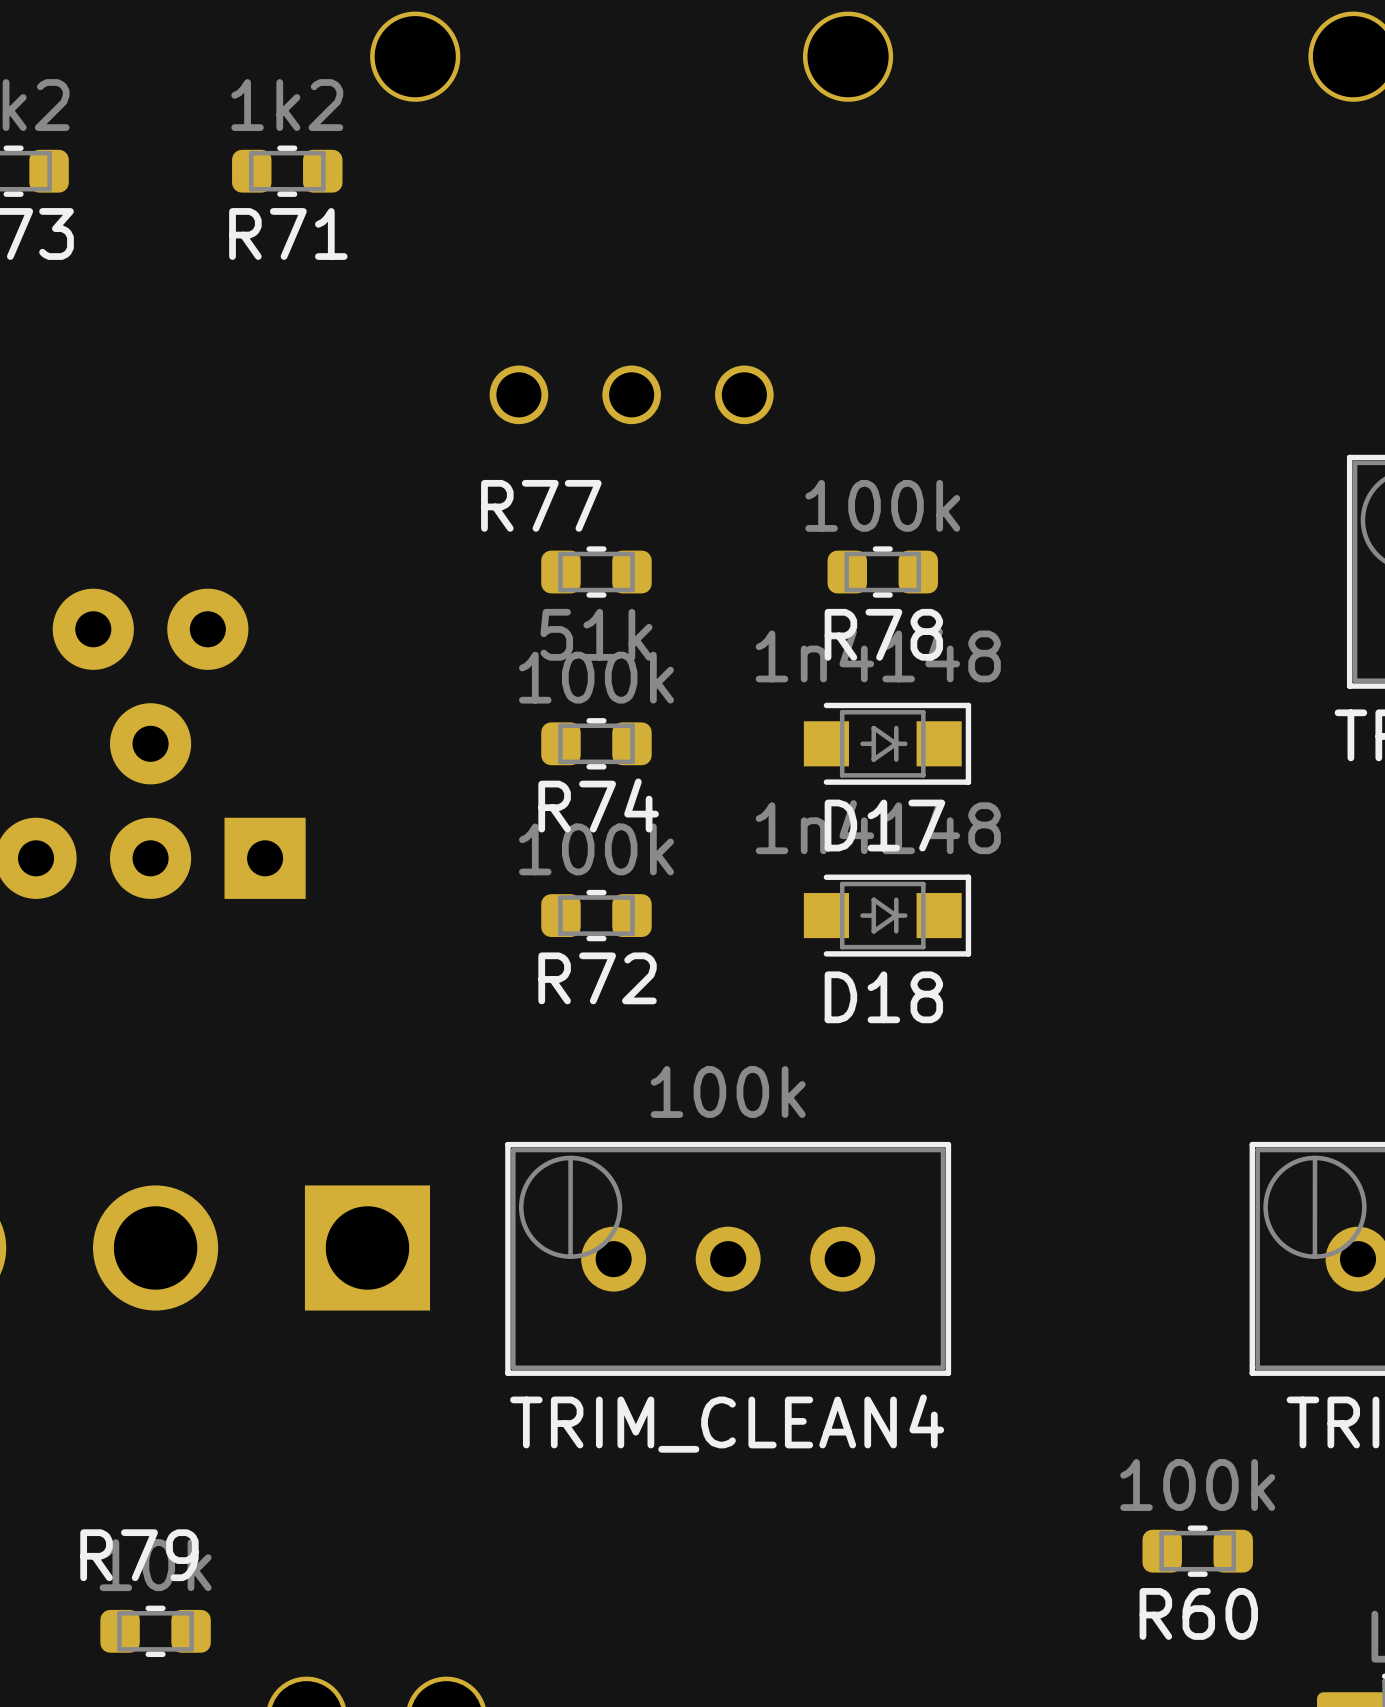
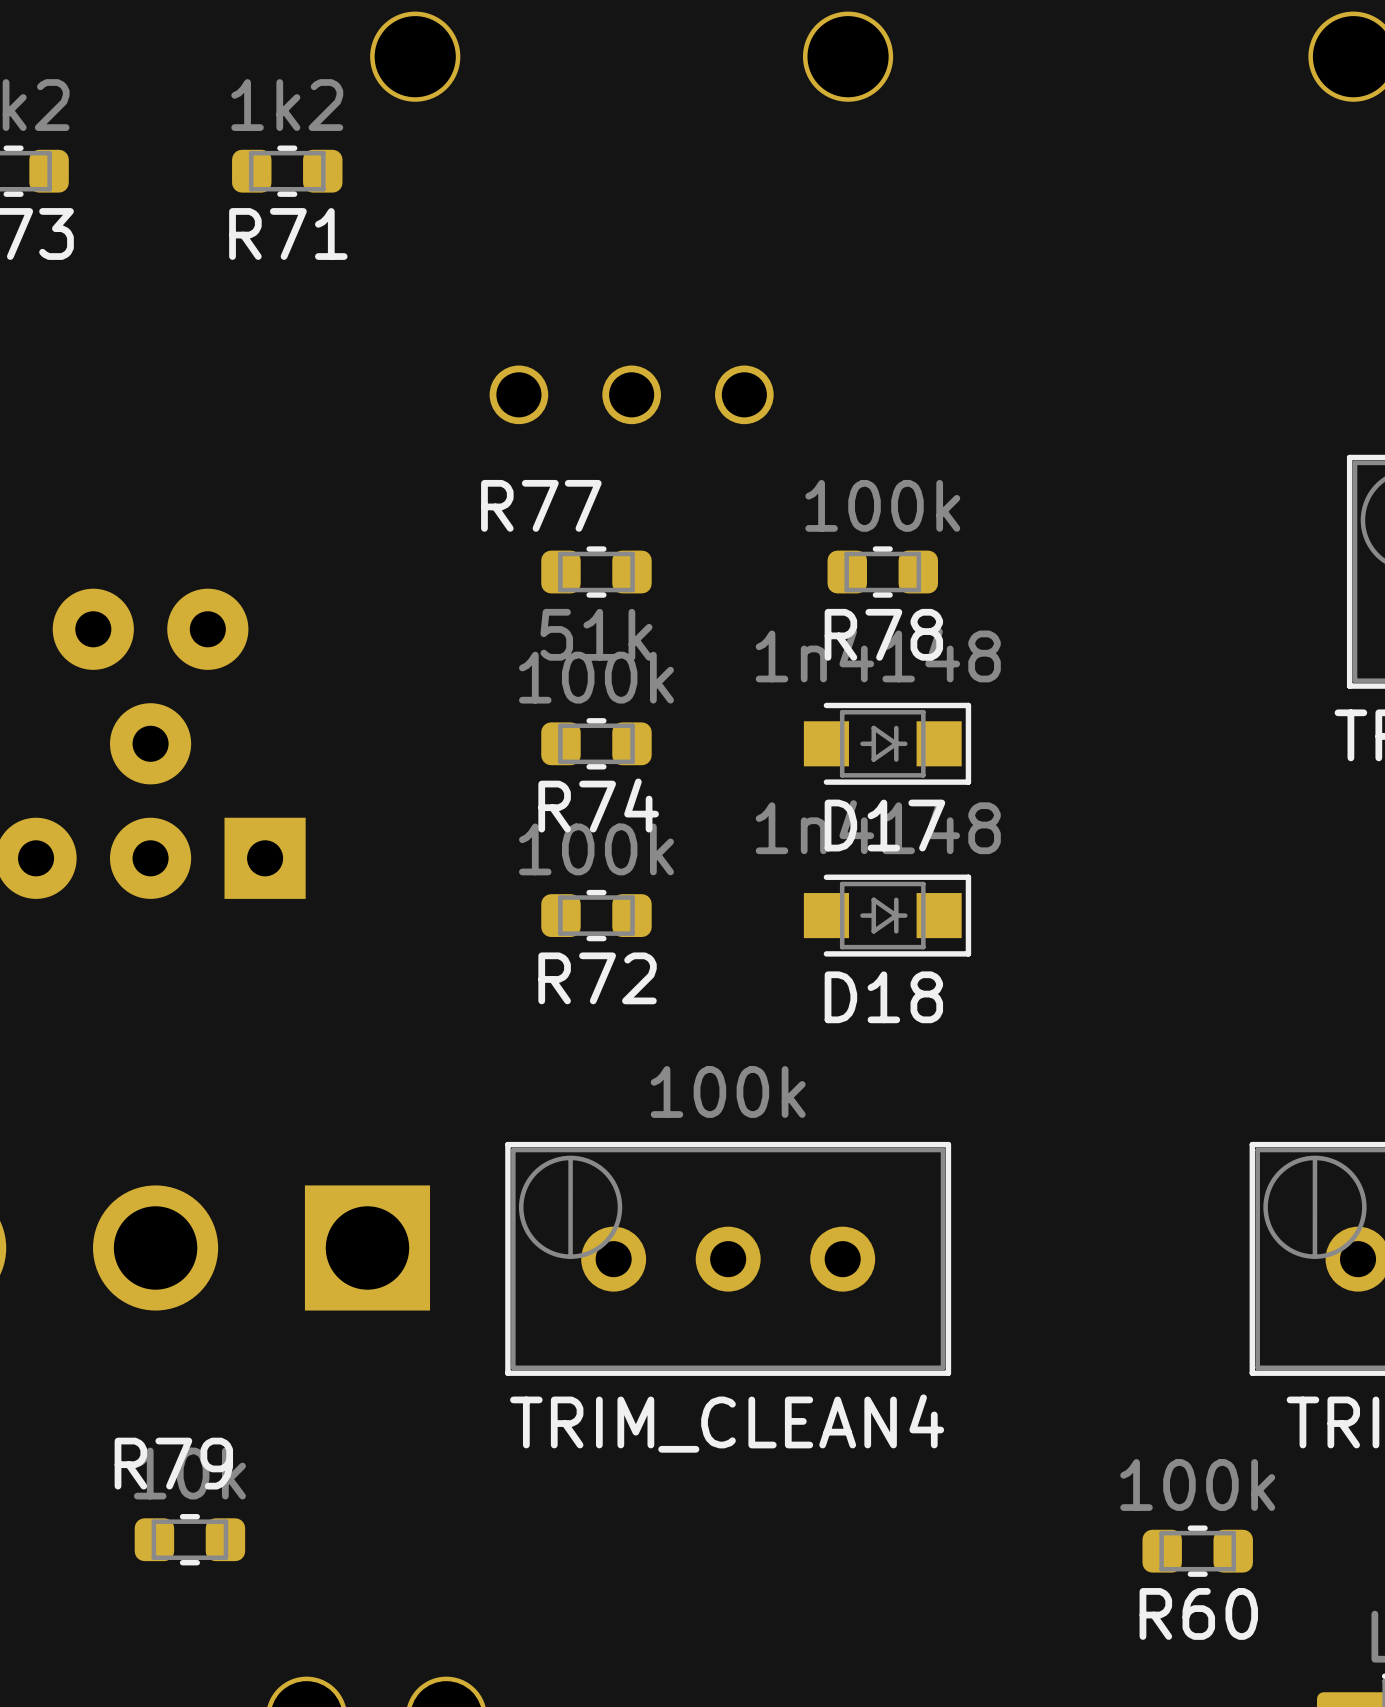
R79 position: (155, 1631) -> (189, 1539)

